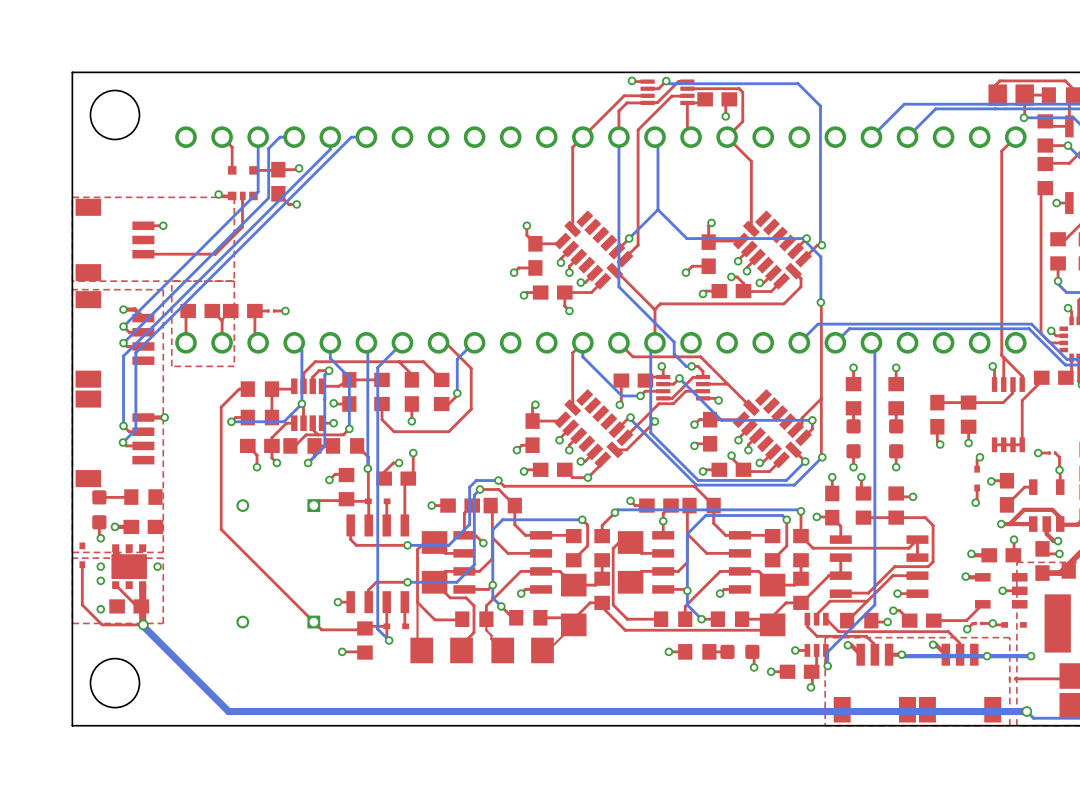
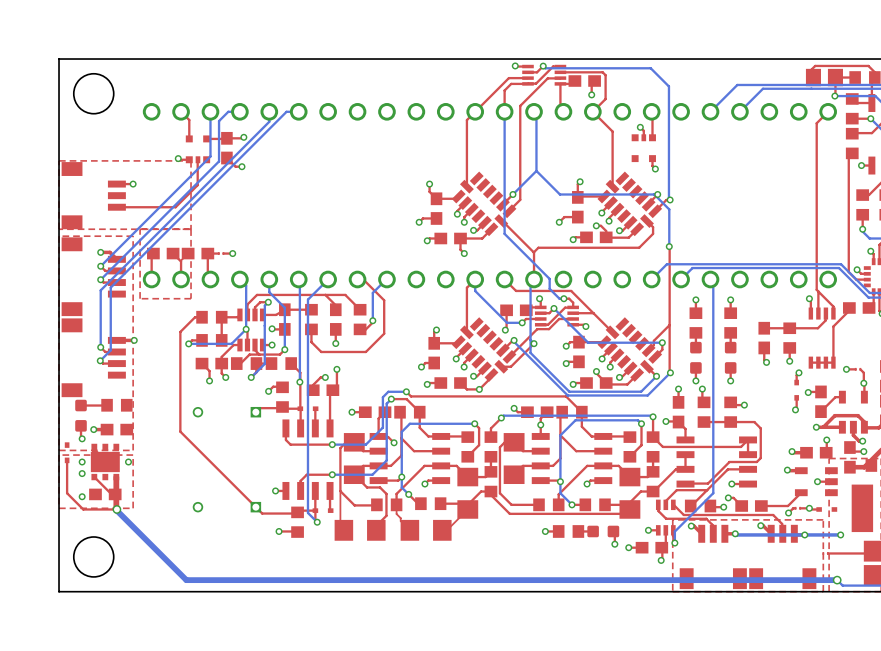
top track: none -> (651, 111) (652, 137)
top track: none -> (640, 127) (643, 130) (643, 137)
via: none -> (640, 127)
part: none -> (643, 148)
top track: none -> (652, 158) (652, 166) (655, 169)
via: none -> (655, 169)

